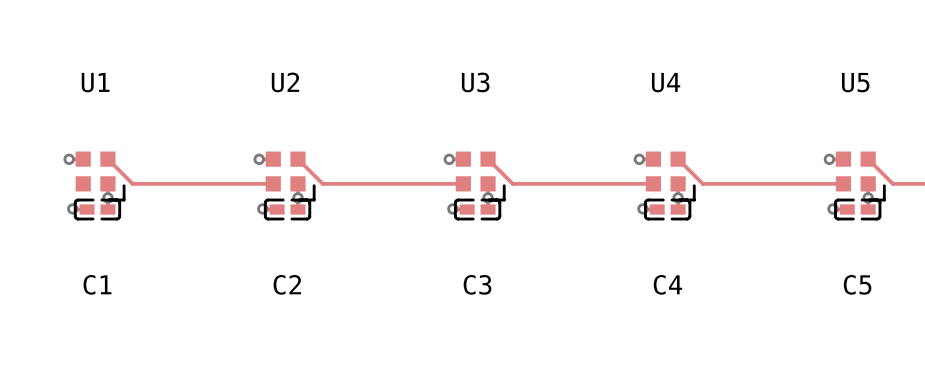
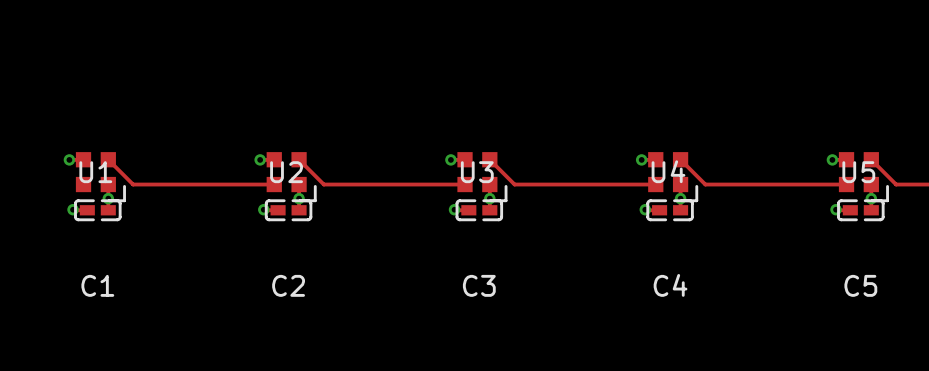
U1 name position: U1 (95, 82) -> U1 (95, 172)
U2 name position: U2 (285, 82) -> U2 (286, 172)
U3 name position: U3 (475, 82) -> U3 (477, 172)
U4 name position: U4 (666, 82) -> U4 (668, 171)
U5 name position: U5 (855, 82) -> U5 (858, 172)

